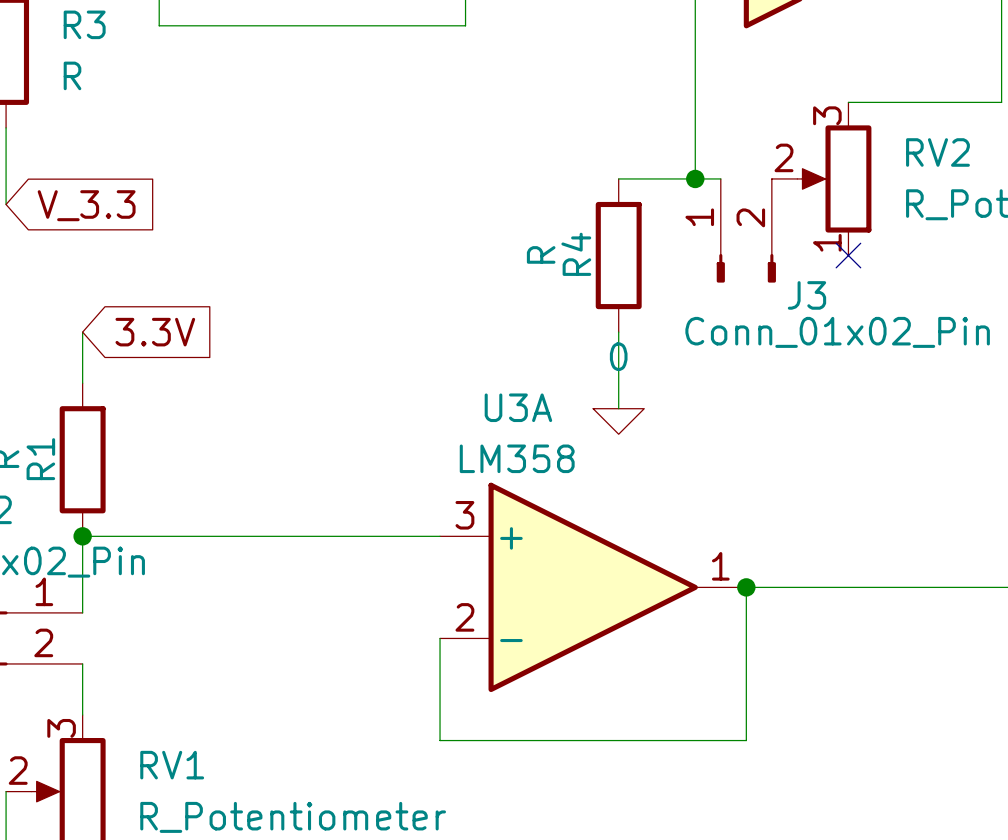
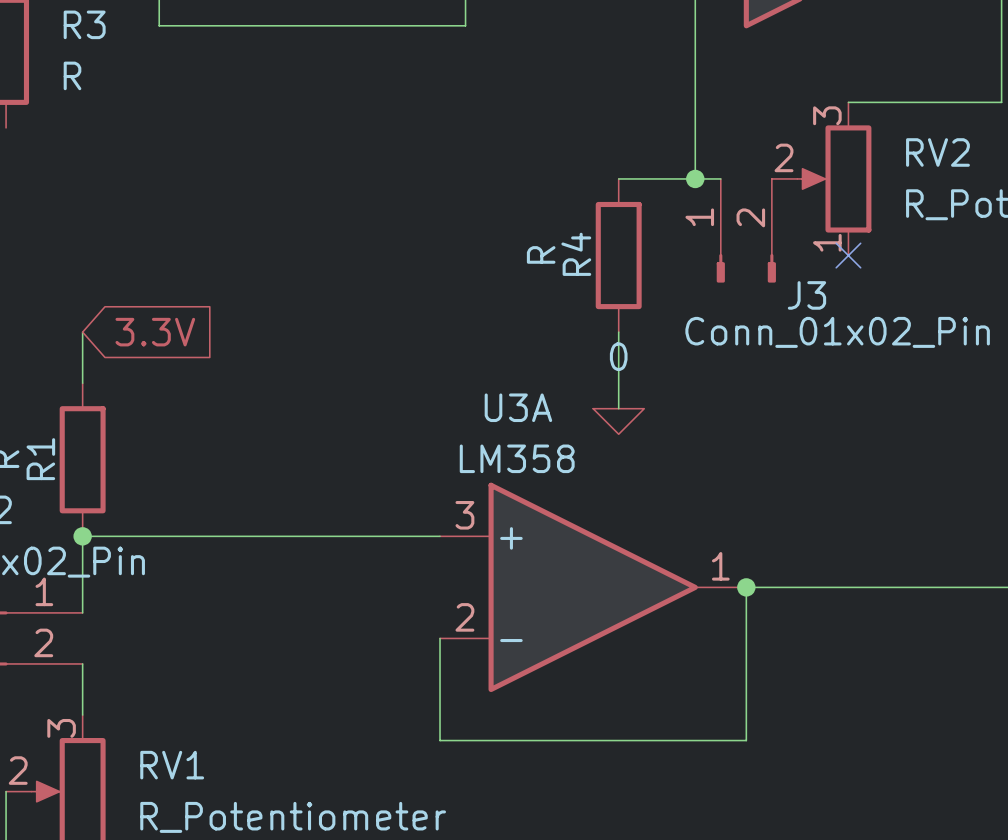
wire: (6, 127) (6, 204) -> none
global label: V_3.3 (86, 205) -> none

